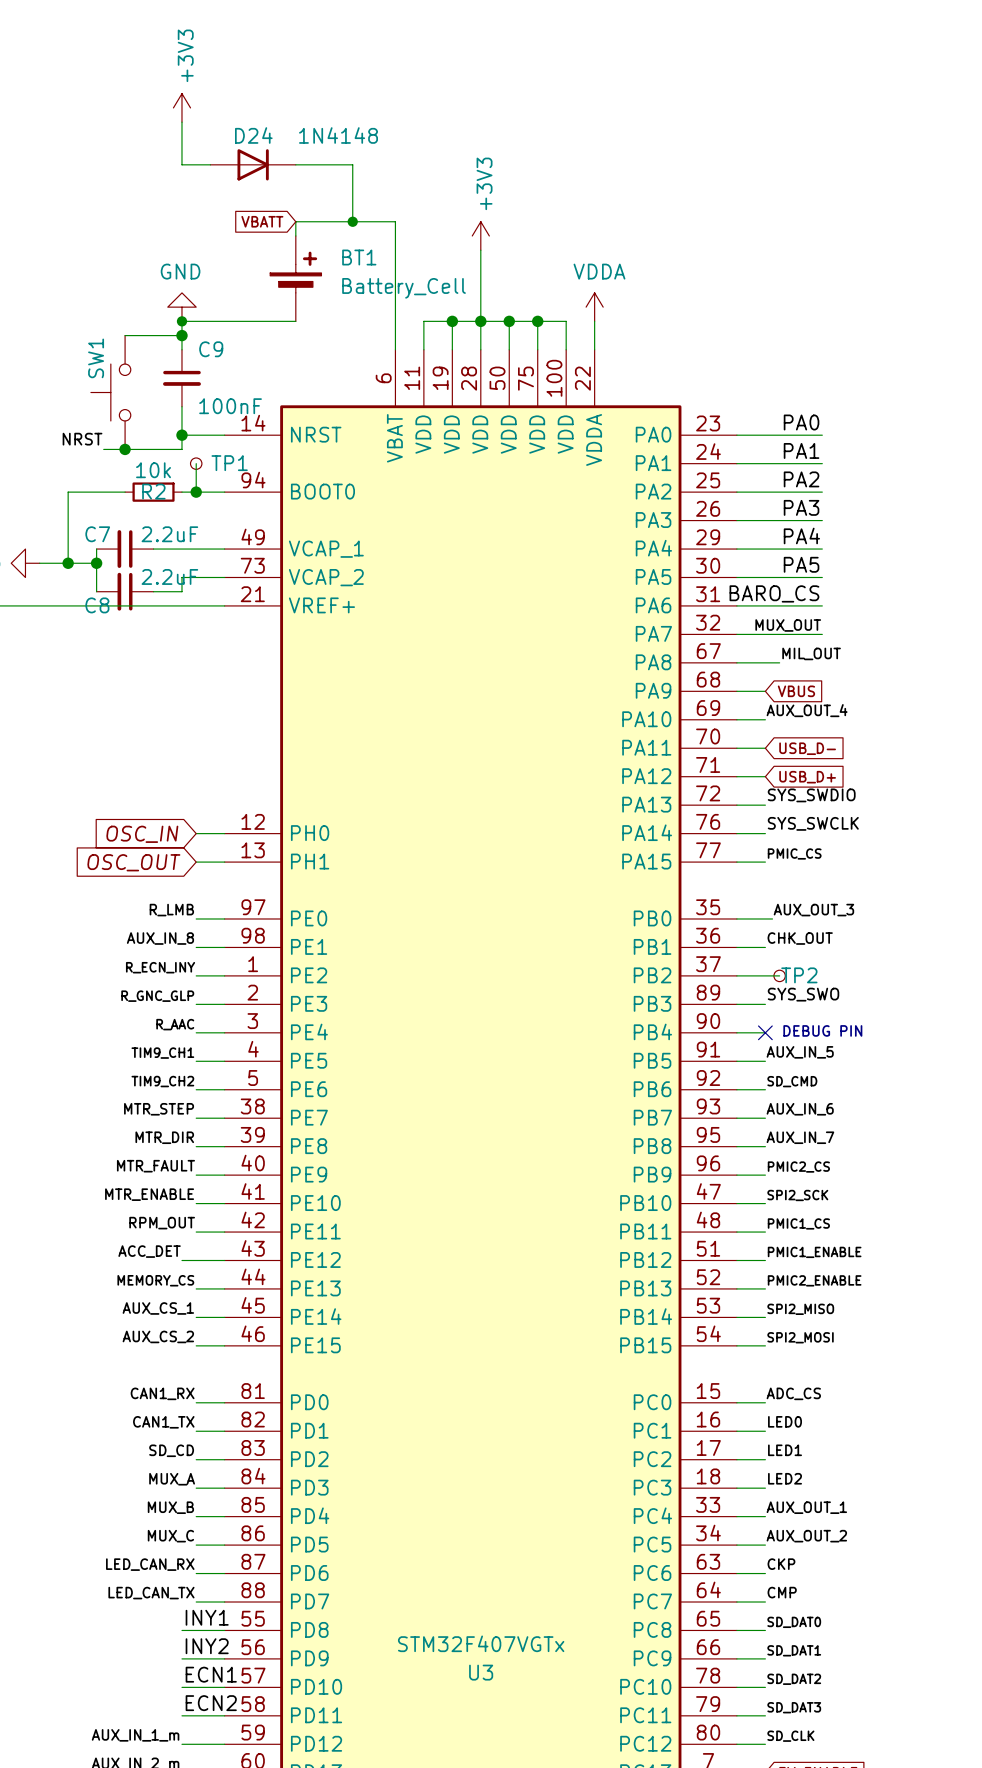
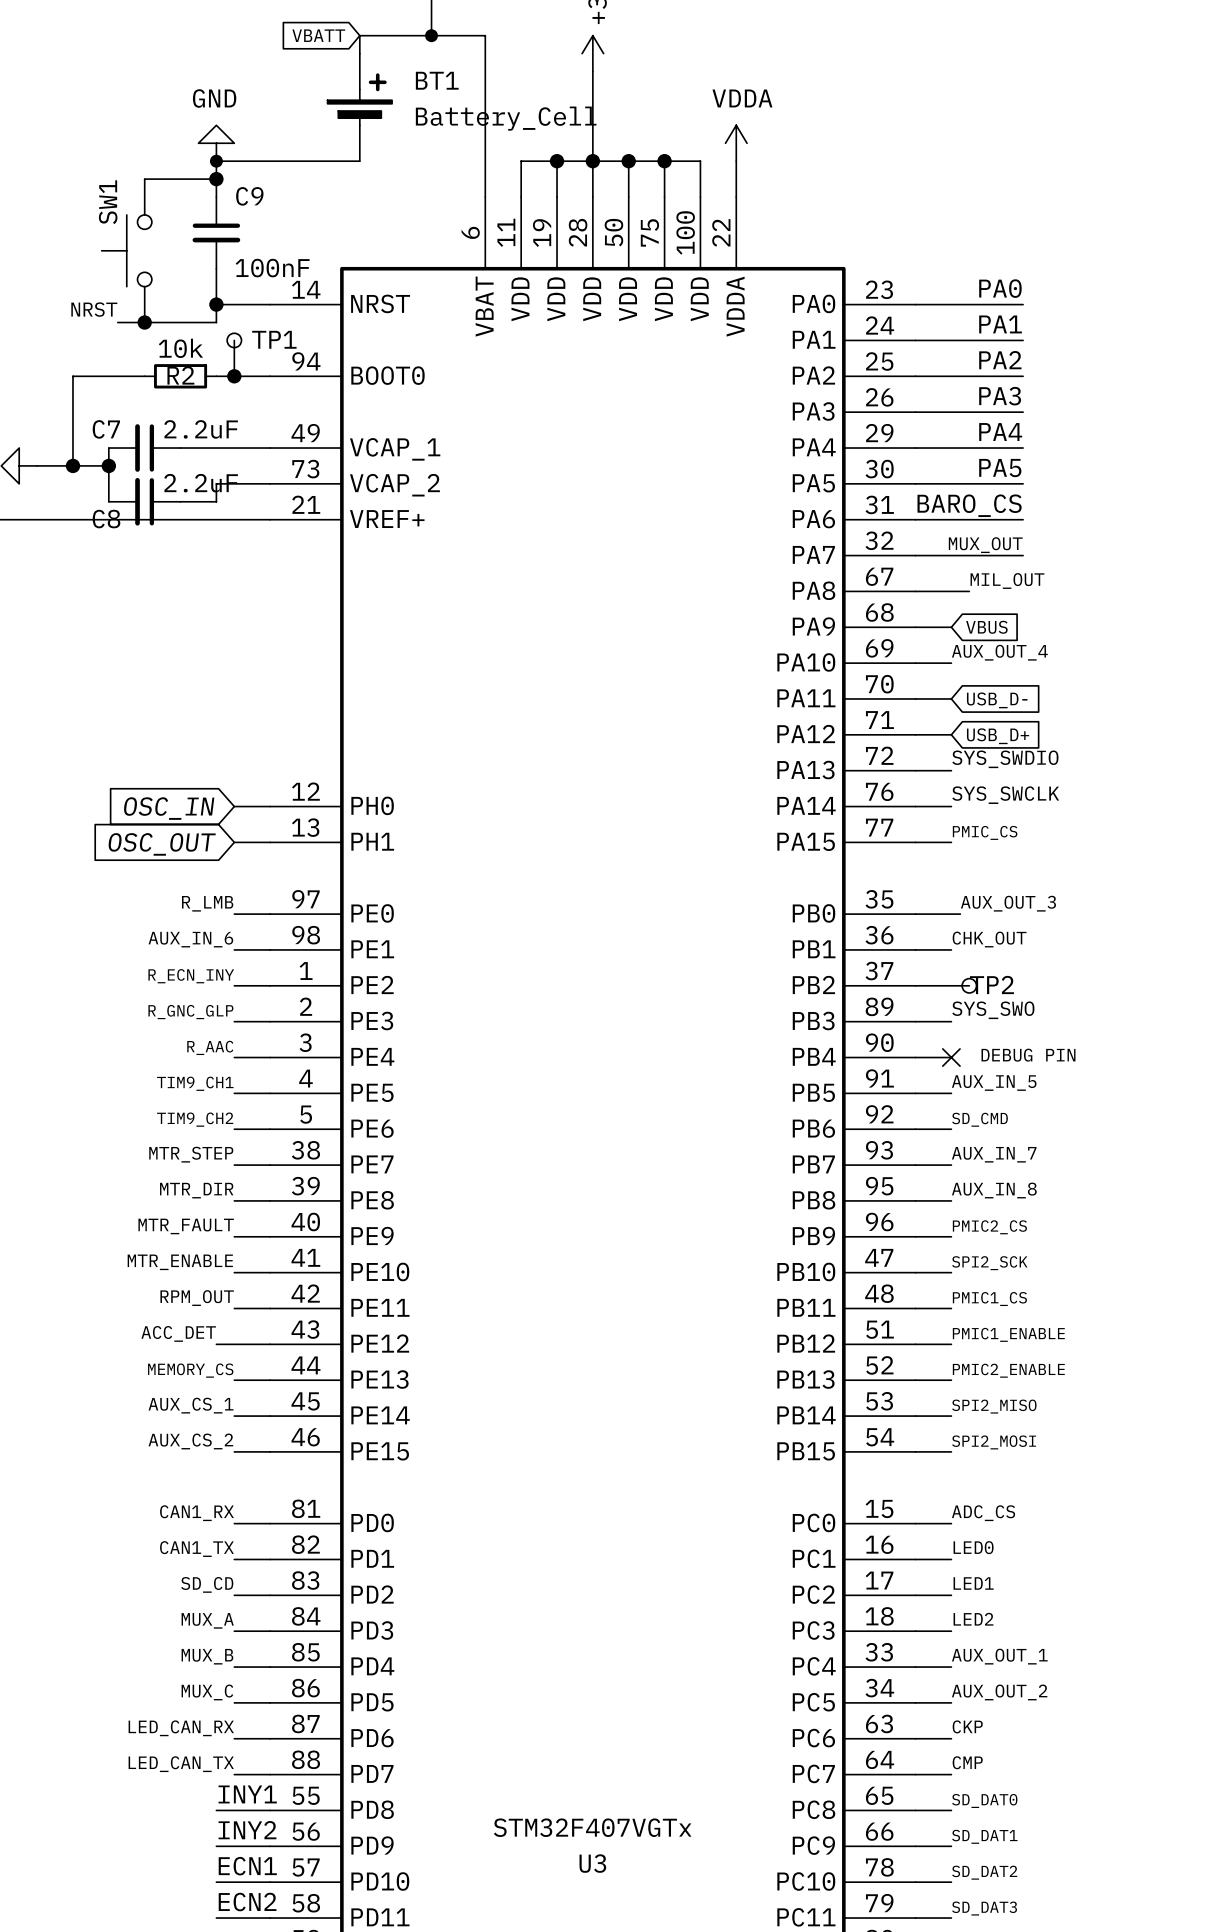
label: AUX_IN_8 (160, 938) -> AUX_IN_6 (190, 939)
label: AUX_IN_6 (800, 1109) -> AUX_IN_7 (994, 1154)
label: AUX_IN_7 (800, 1137) -> AUX_IN_8 (994, 1190)

